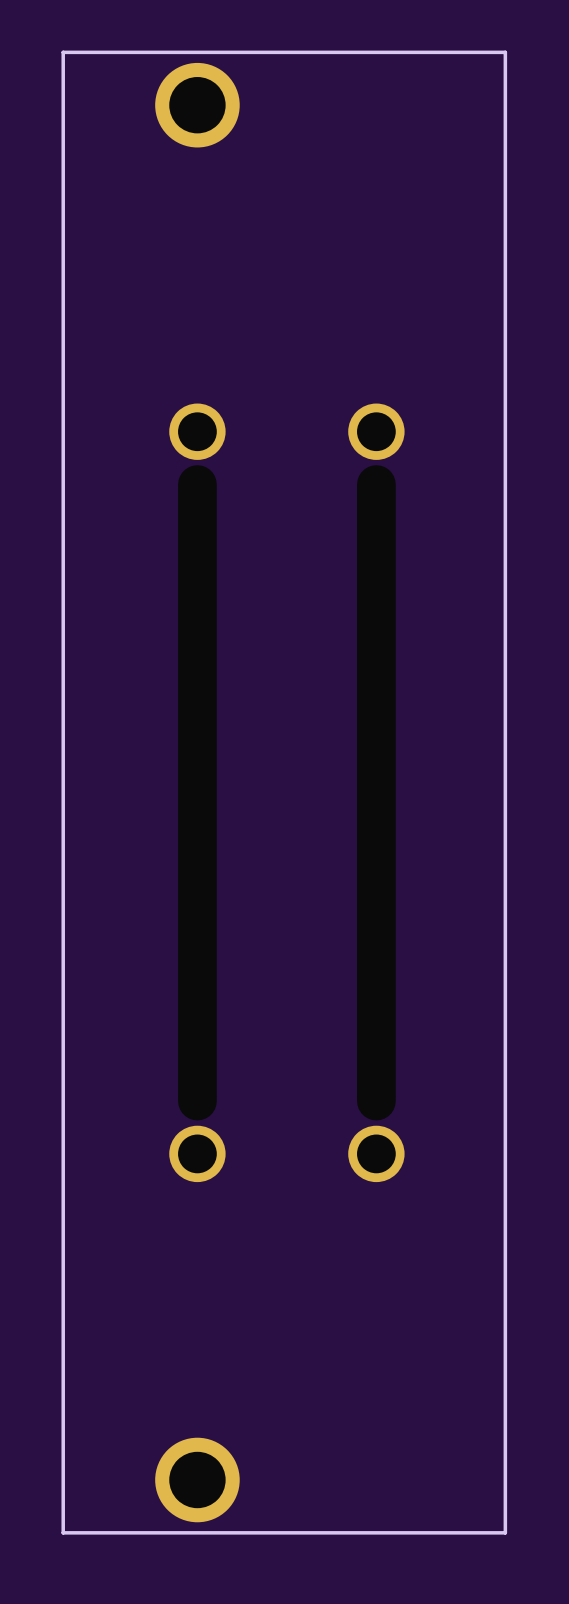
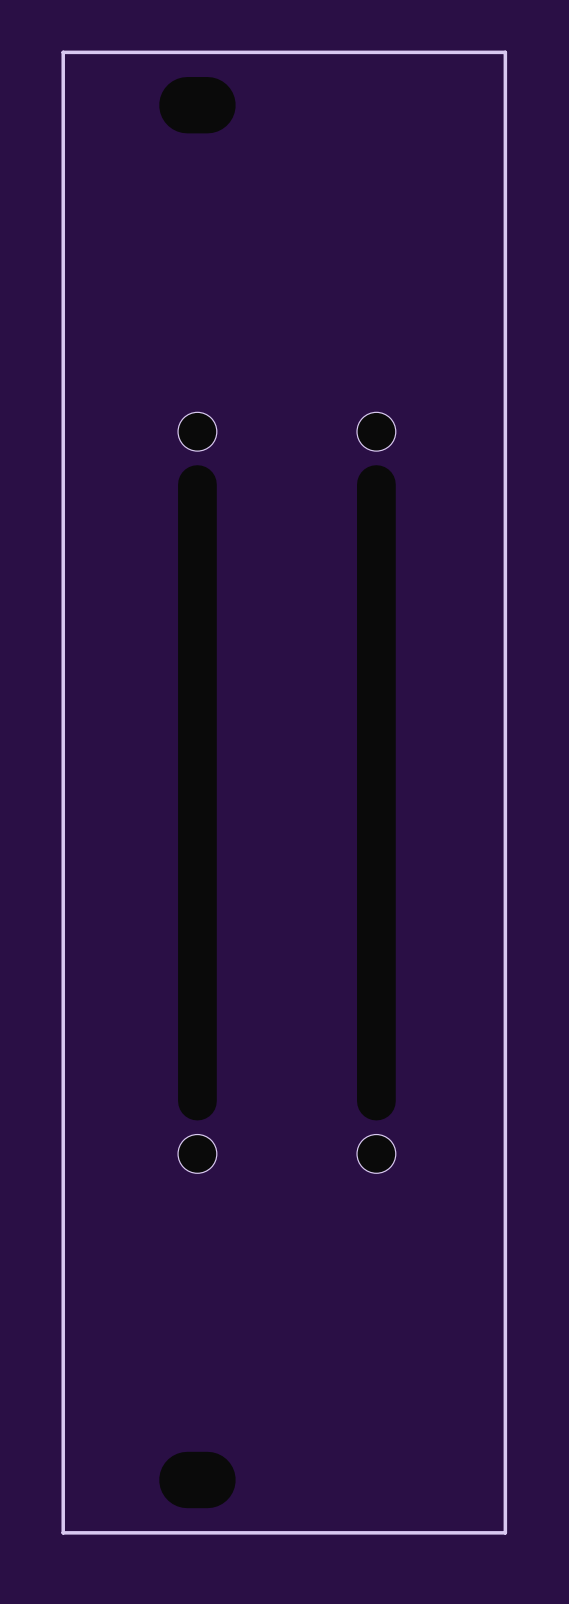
part footprint: [155, 62, 240, 148] -> [159, 77, 236, 134]
part footprint: [169, 403, 226, 1183] -> [178, 412, 217, 1174]
part footprint: [348, 403, 405, 1183] -> [357, 412, 396, 1174]
part footprint: [155, 1437, 240, 1523] -> [159, 1451, 236, 1509]

